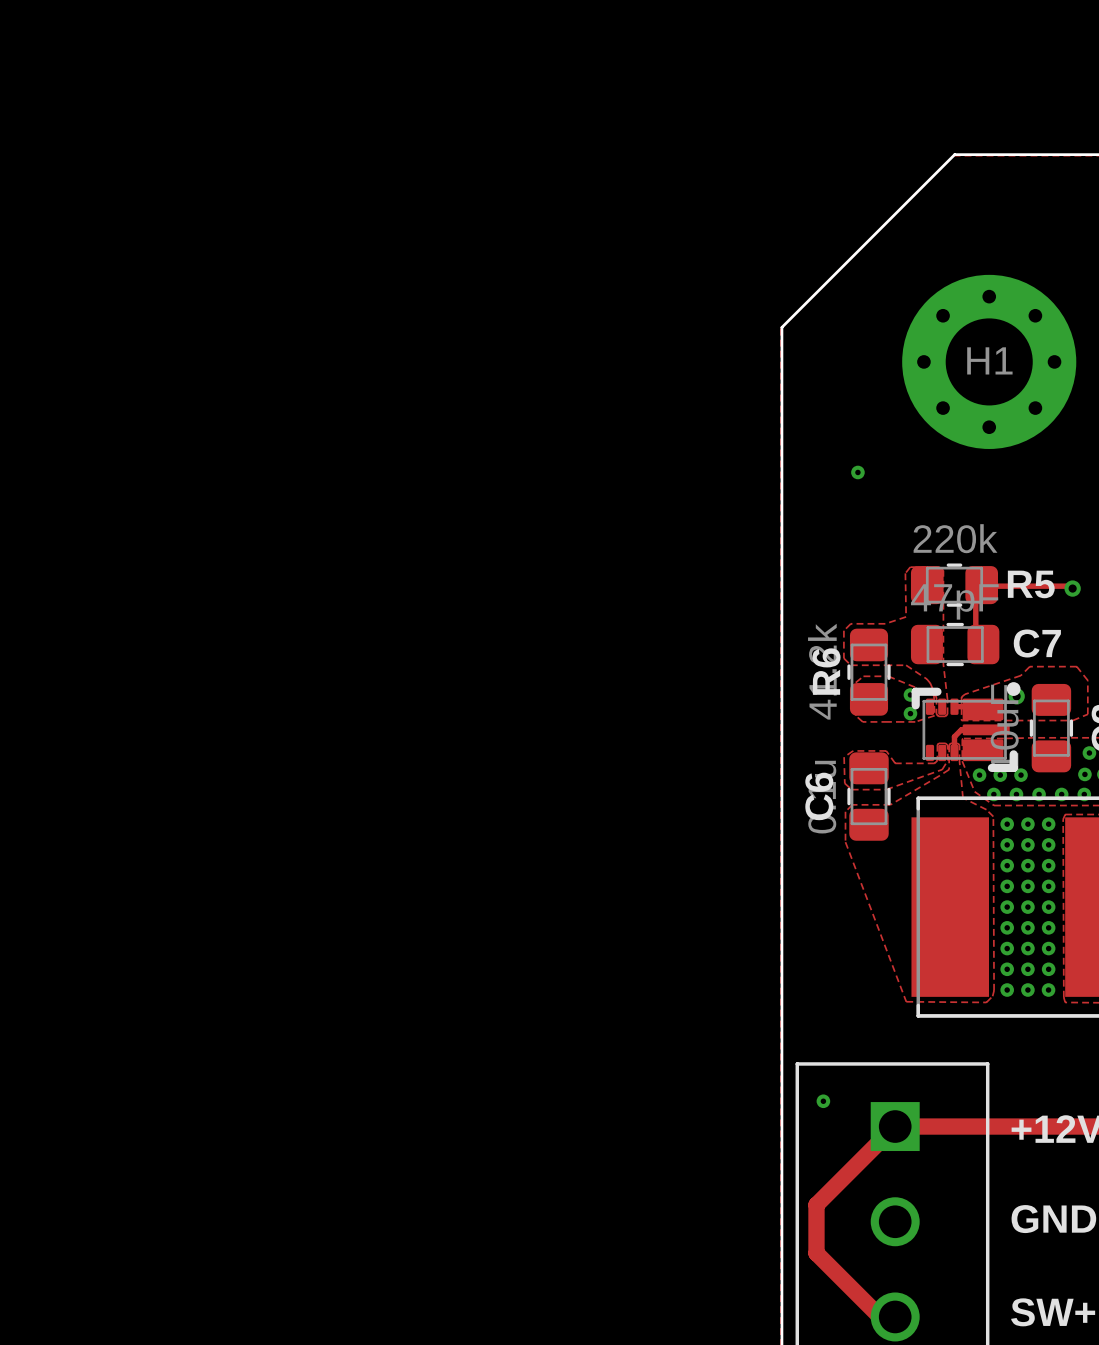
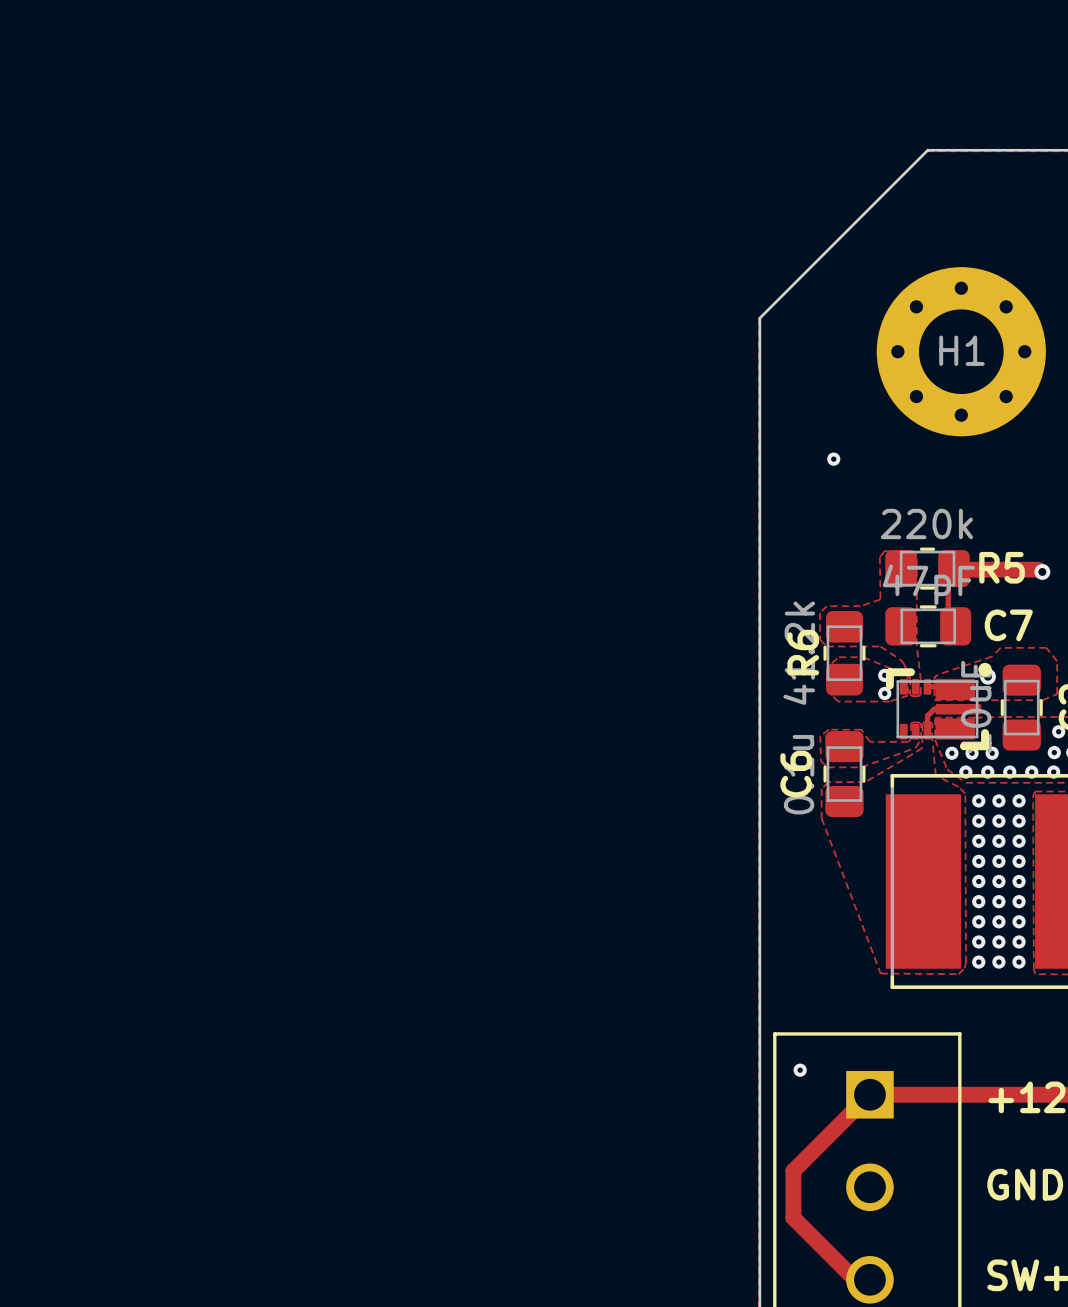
track width: thin (980, 586) (1068, 586) -> thick (952, 569) (1038, 569)

